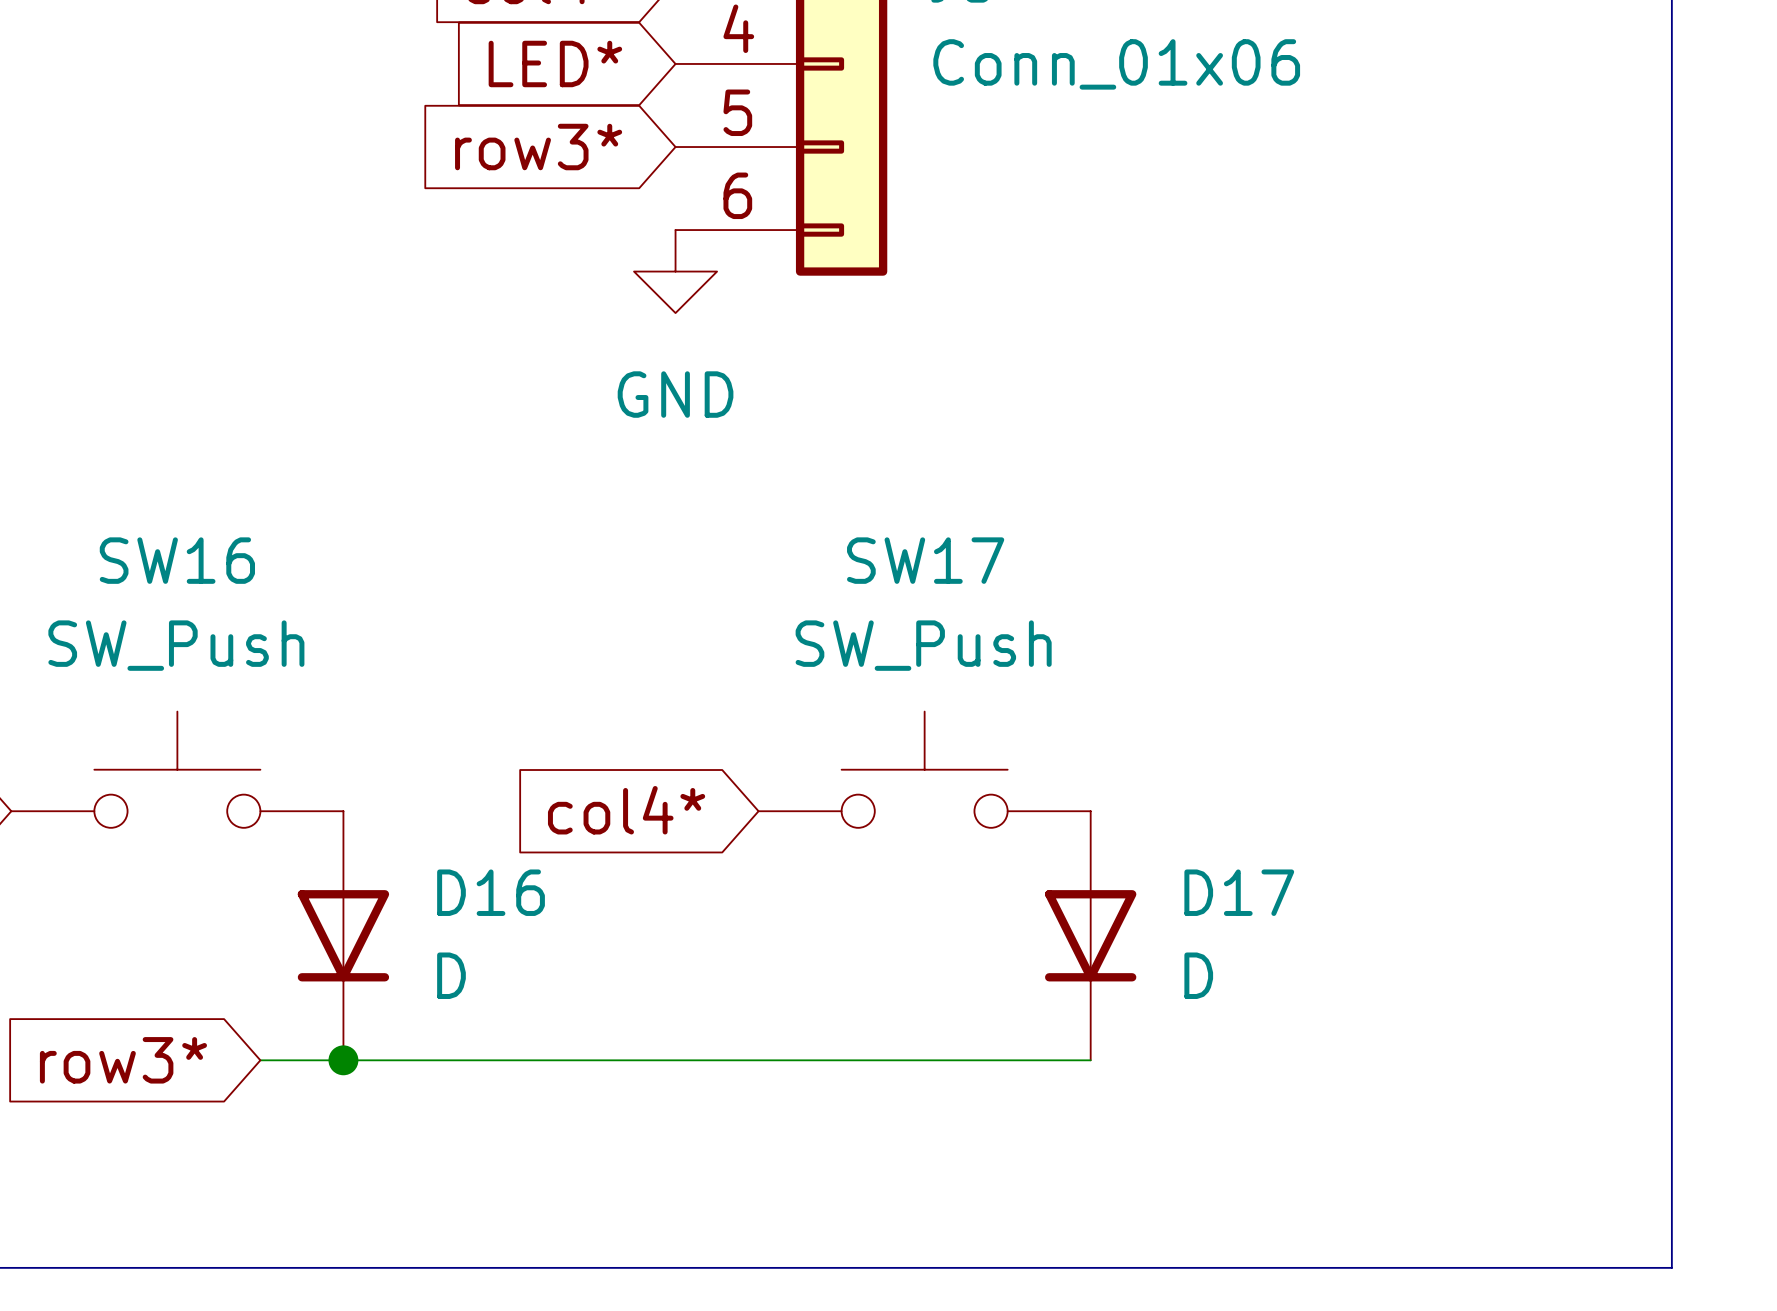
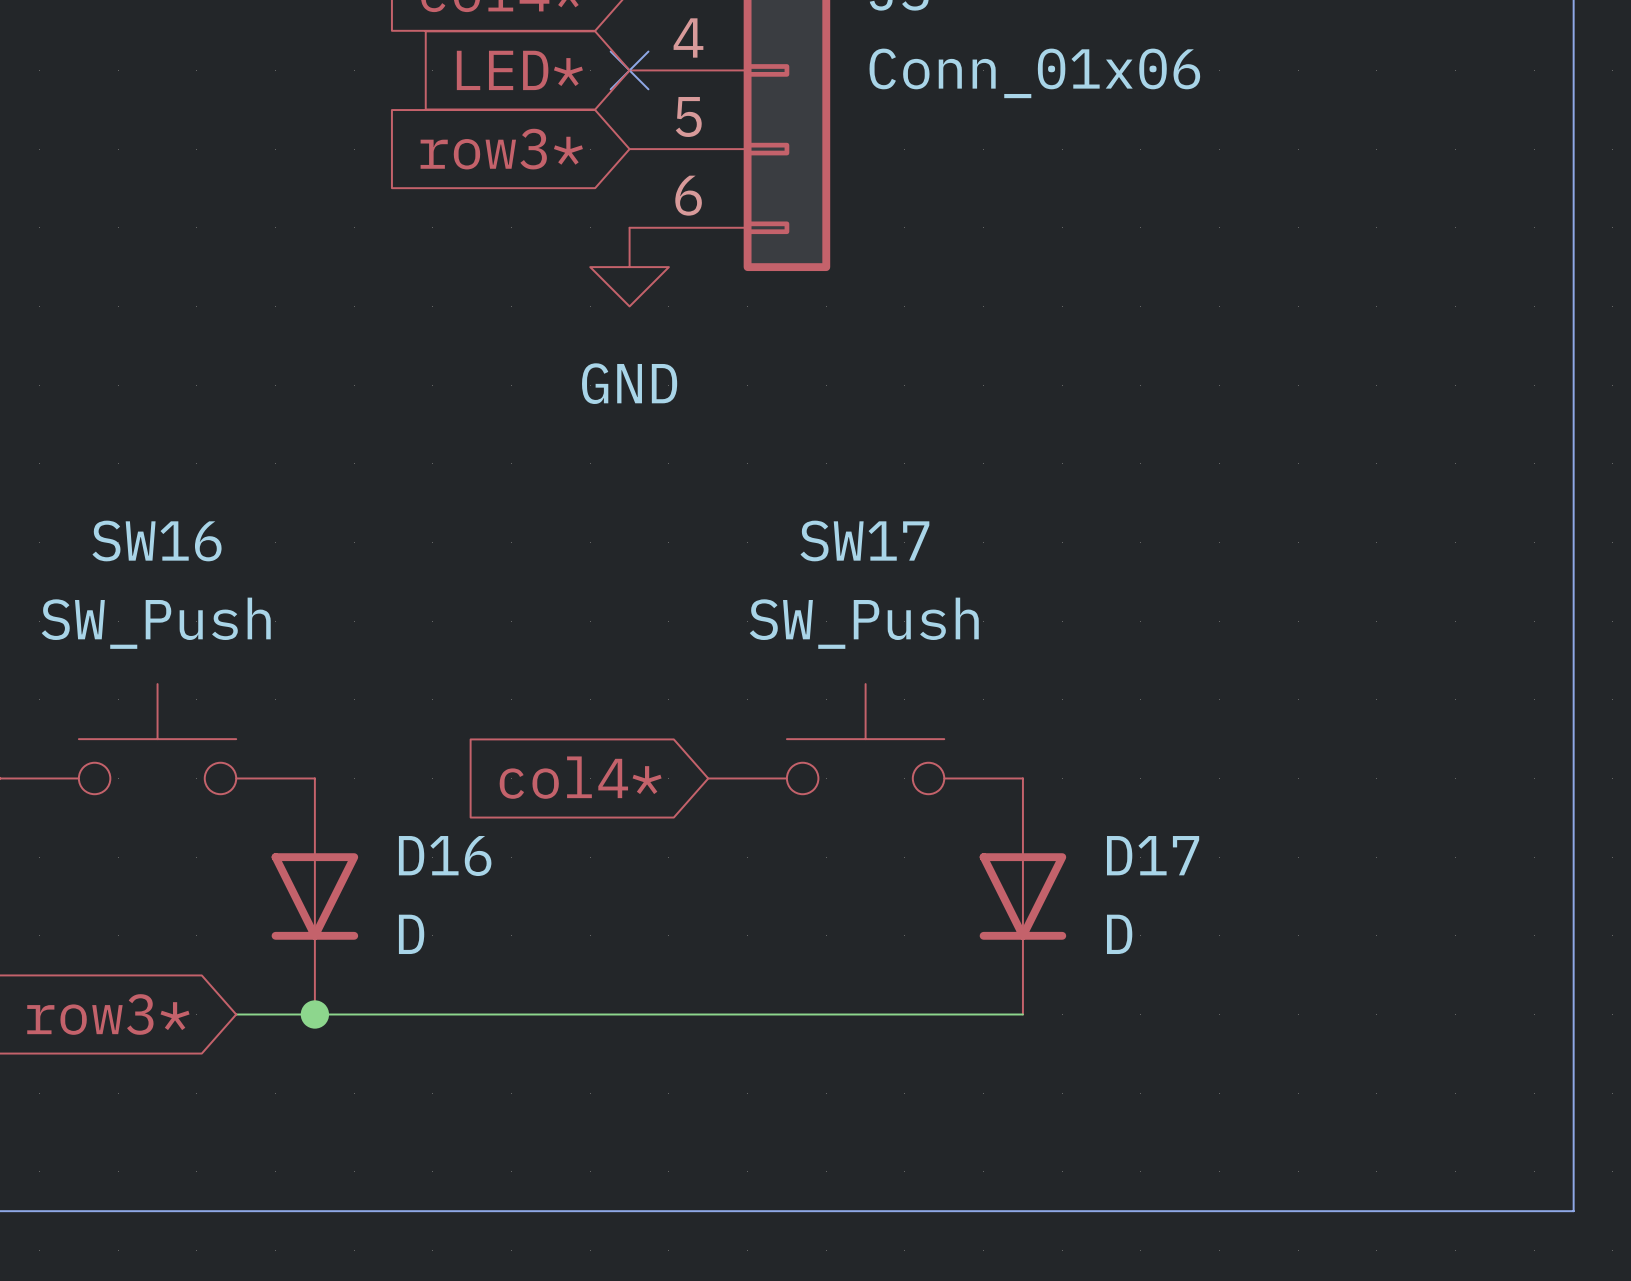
no-connect mark: none -> (629, 70)

